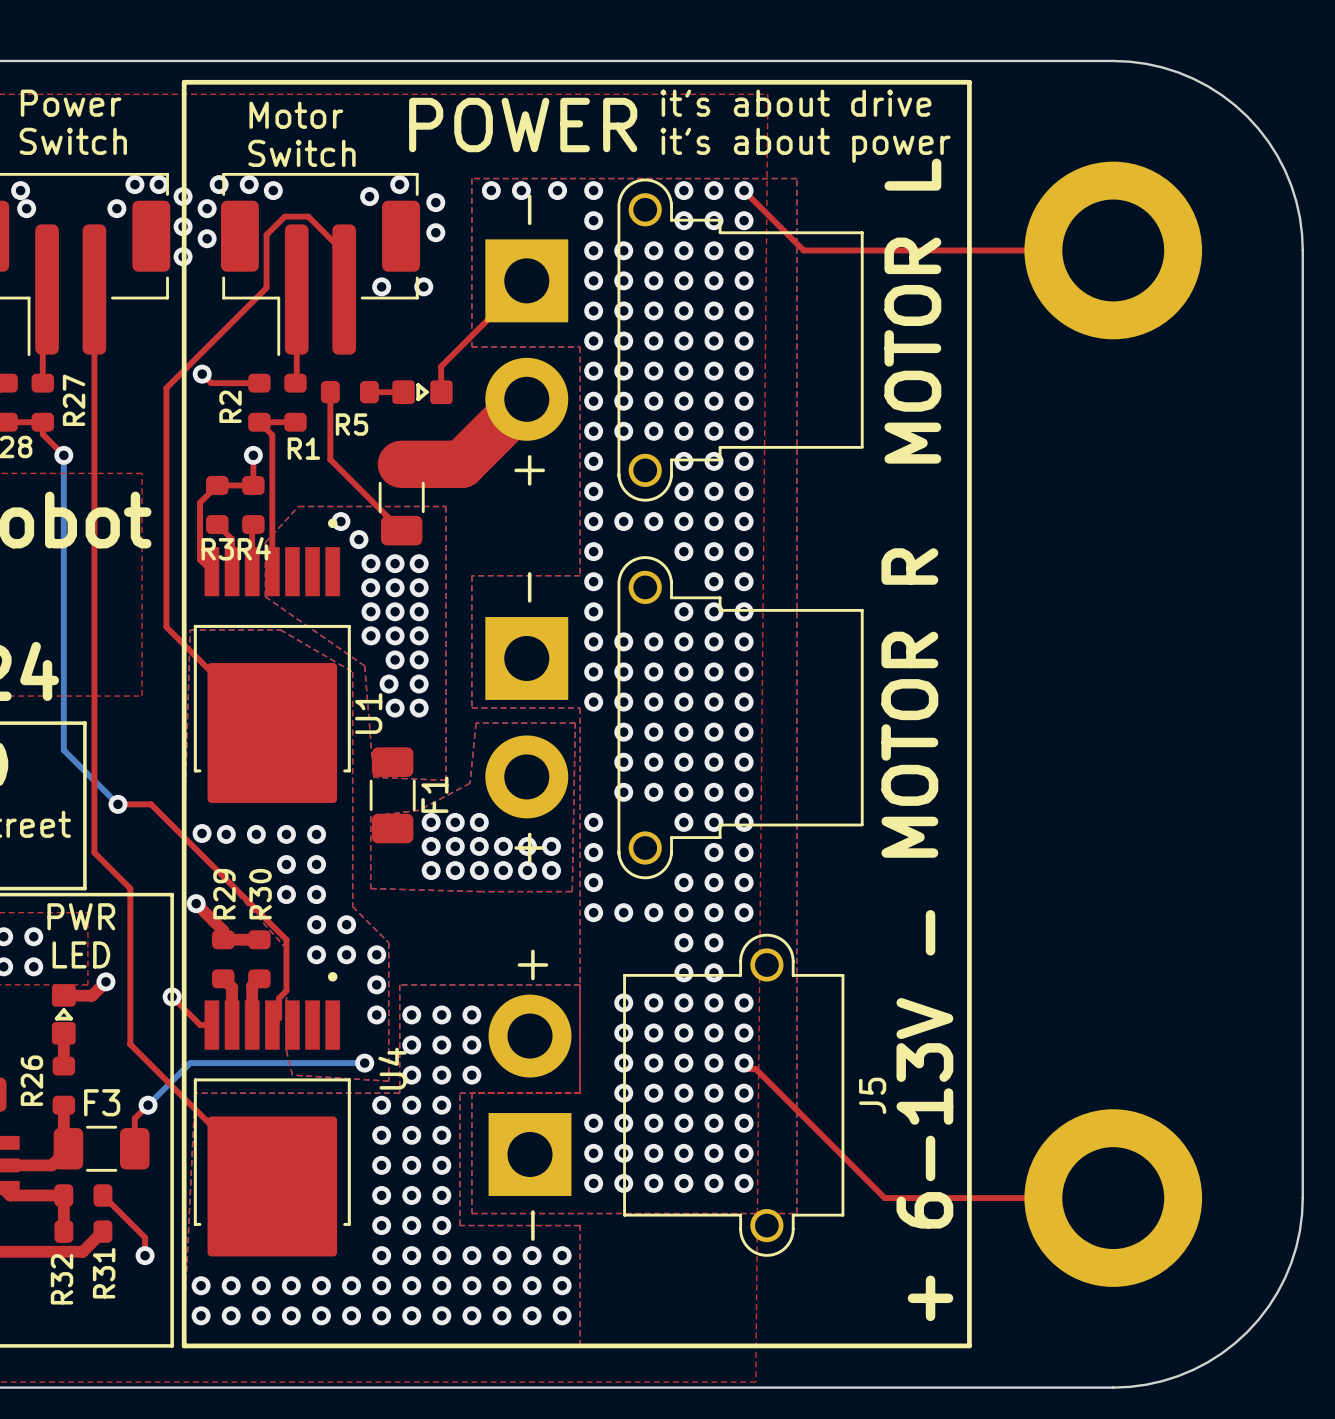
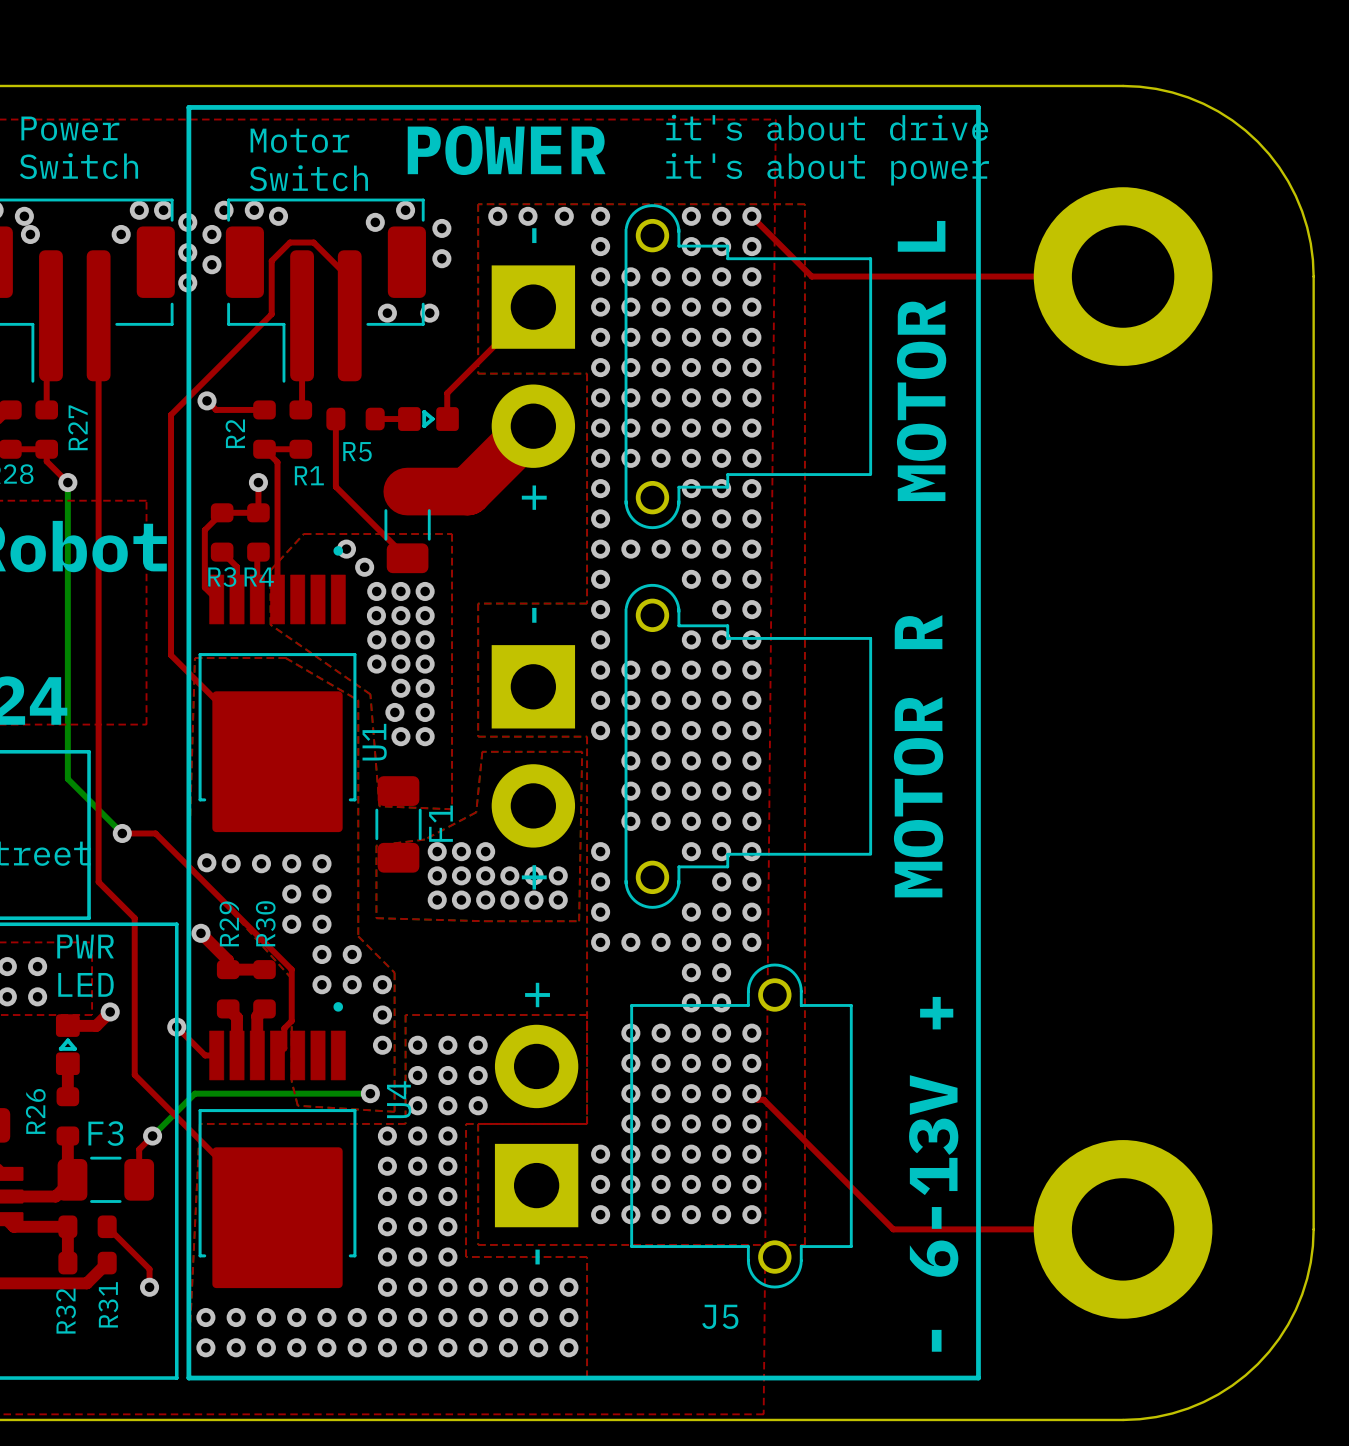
J5 name rotation: 0° (872, 1095) -> 90° clockwise (720, 1316)
J5 name position: J5 (872, 1095) -> J5 (720, 1316)
text: + 6-13V - (924, 1115) -> - 6-13V + (933, 1174)

